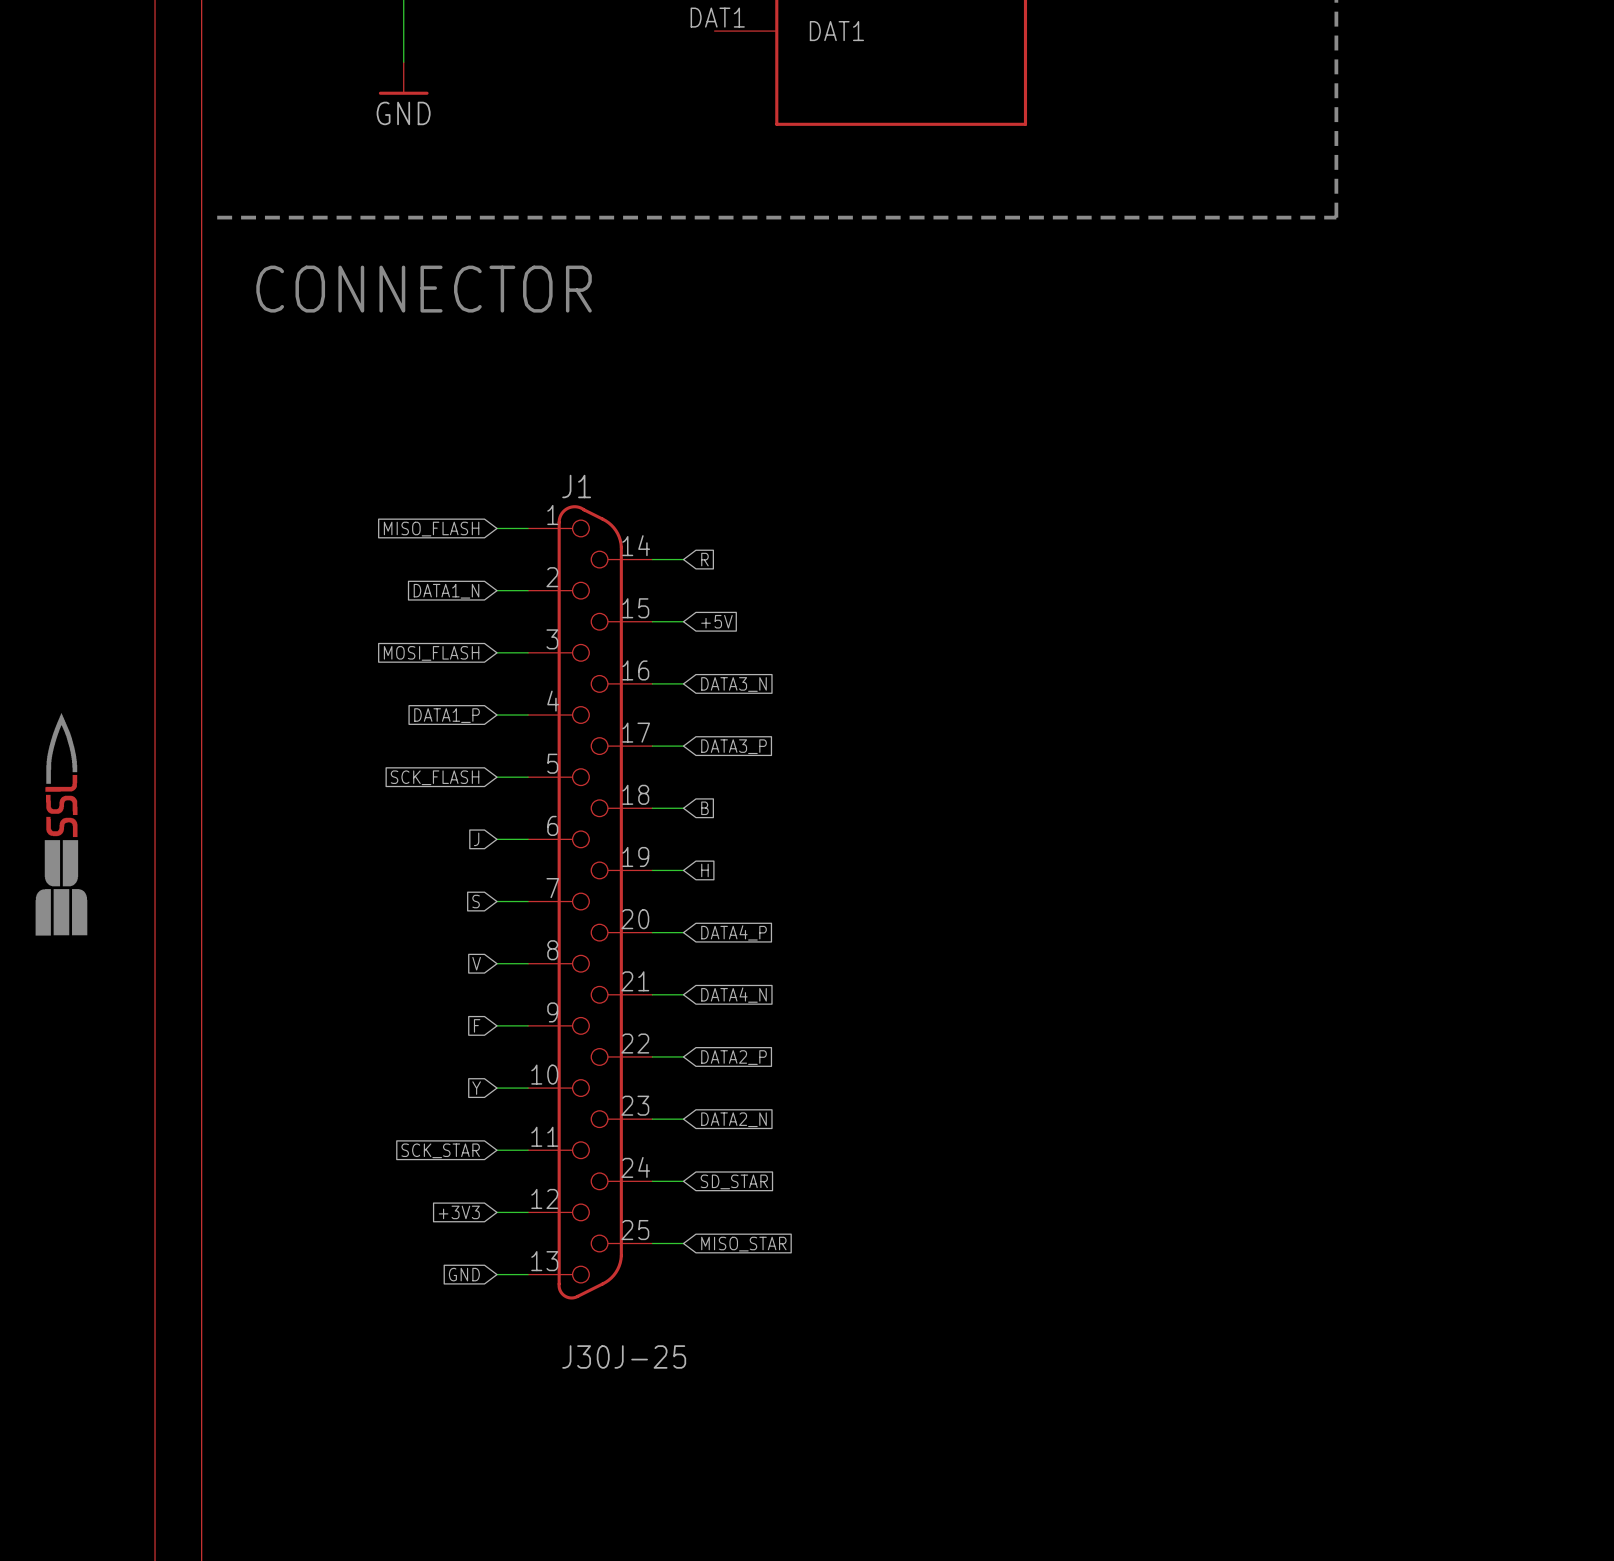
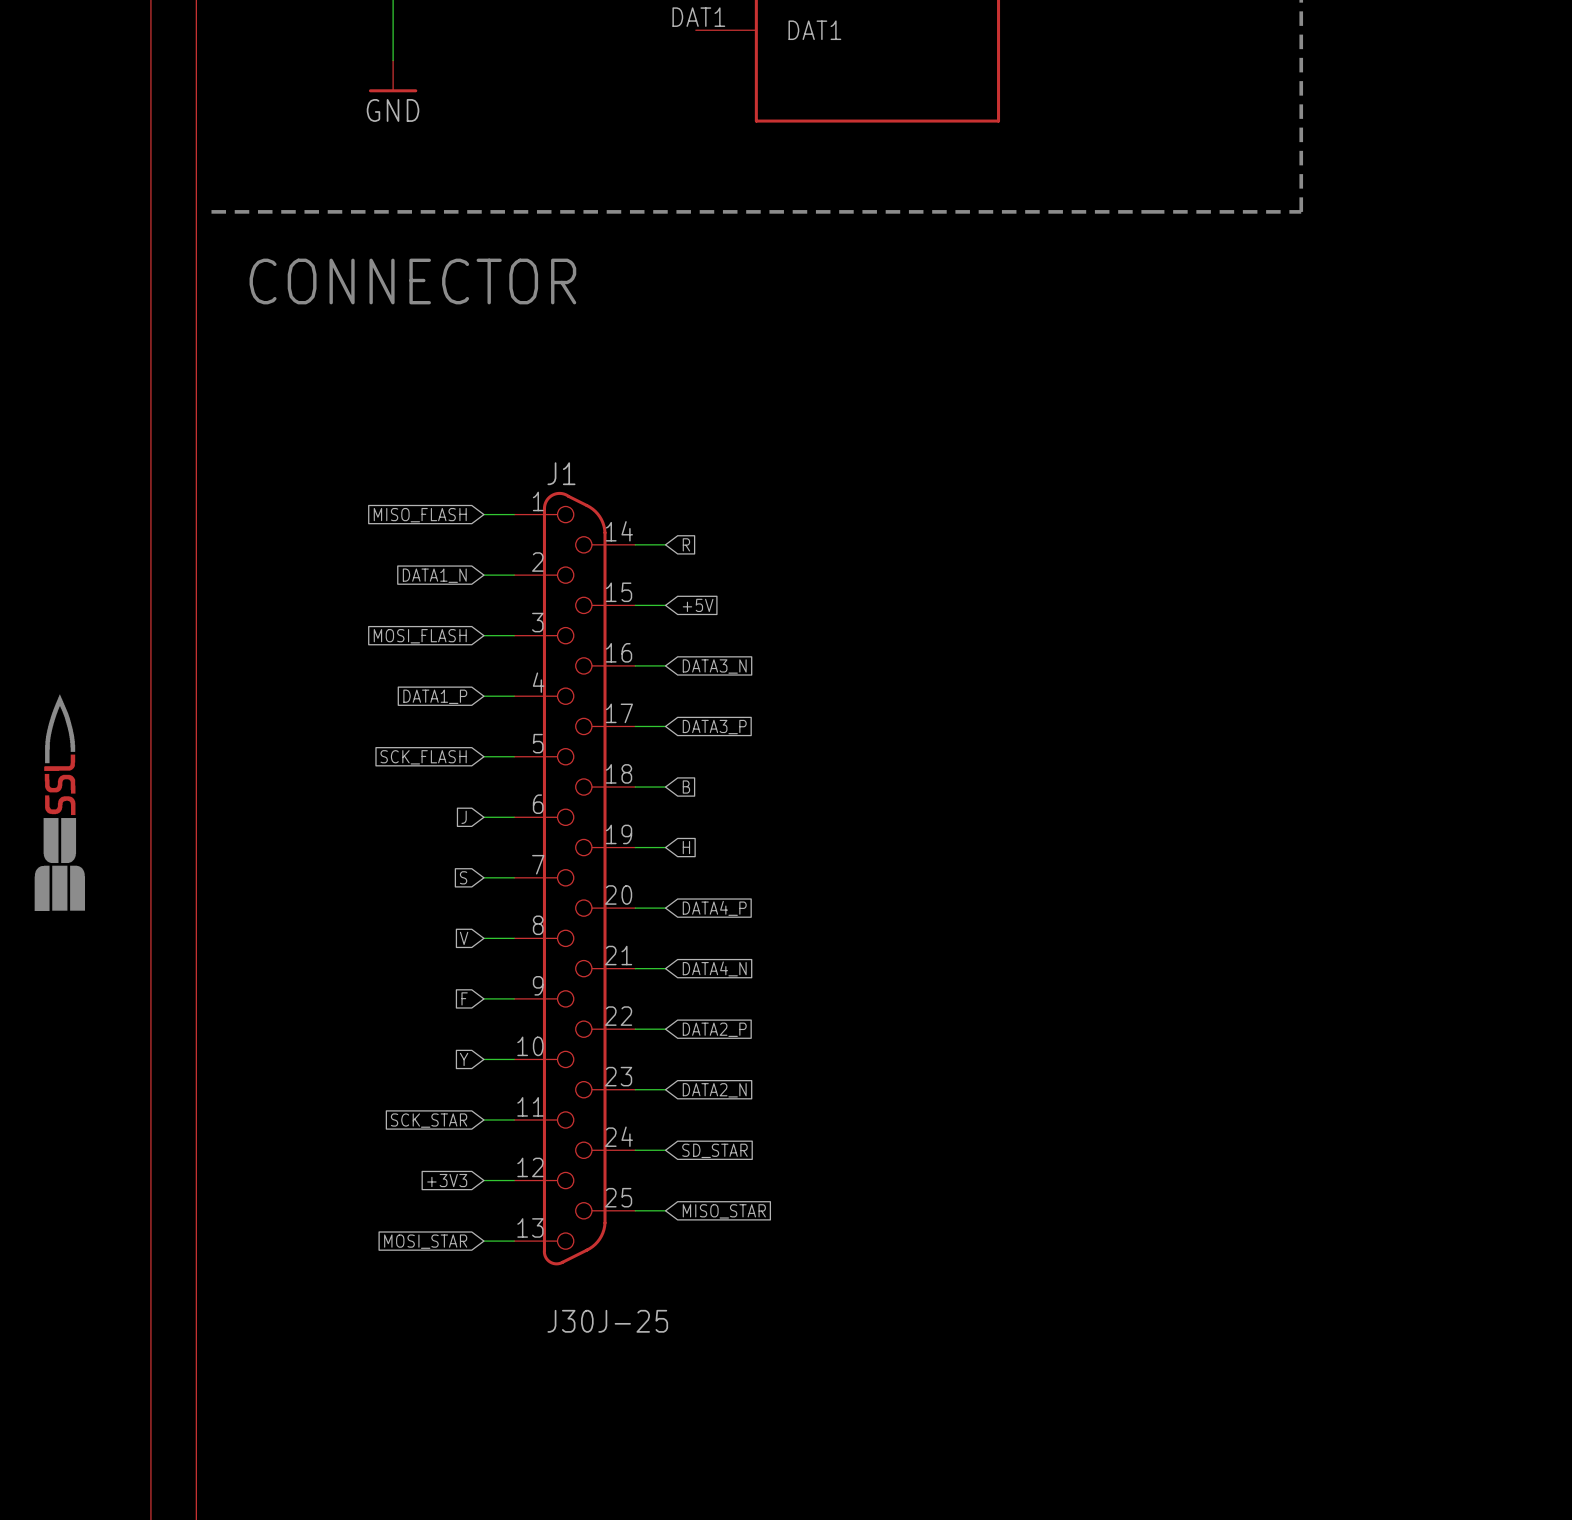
global label: GND (464, 1274) -> MOSI_STAR (425, 1241)

